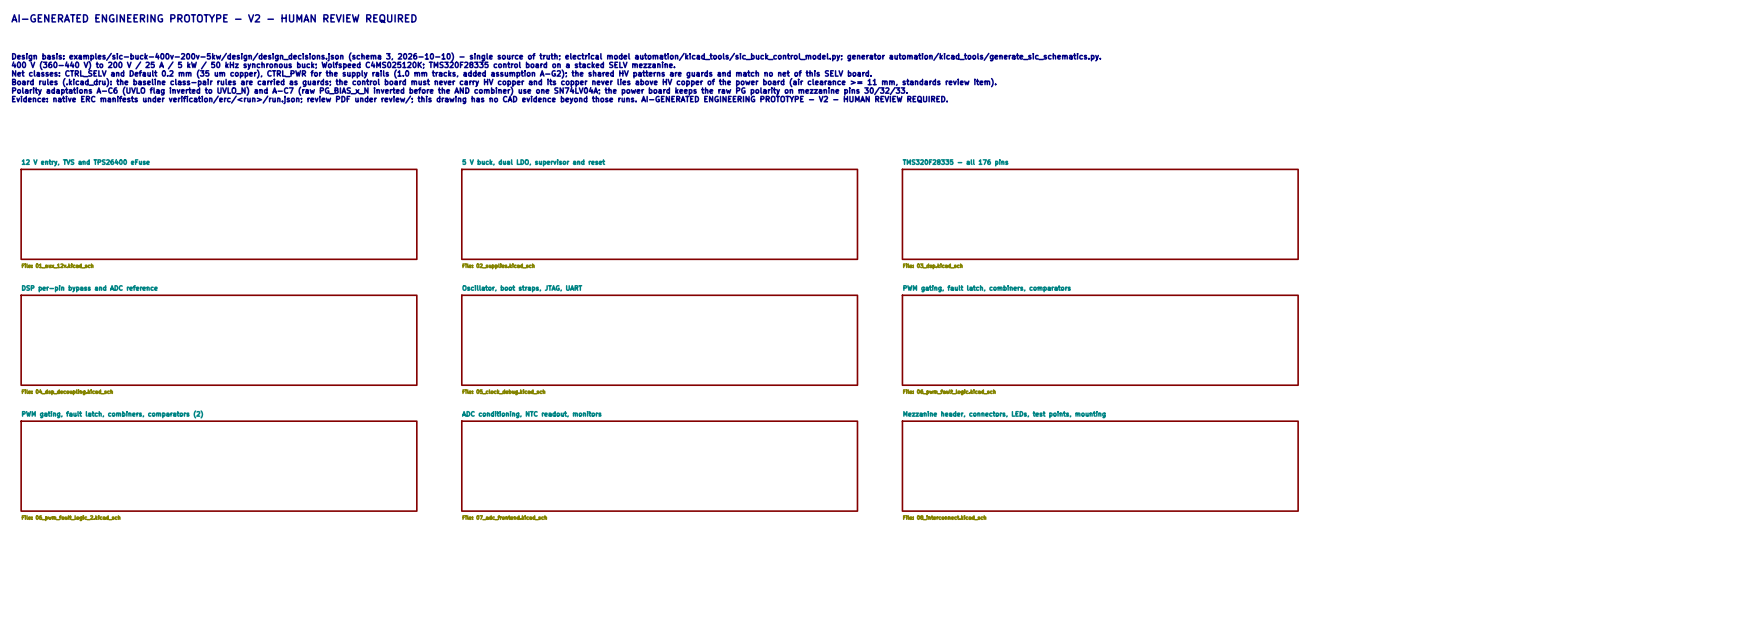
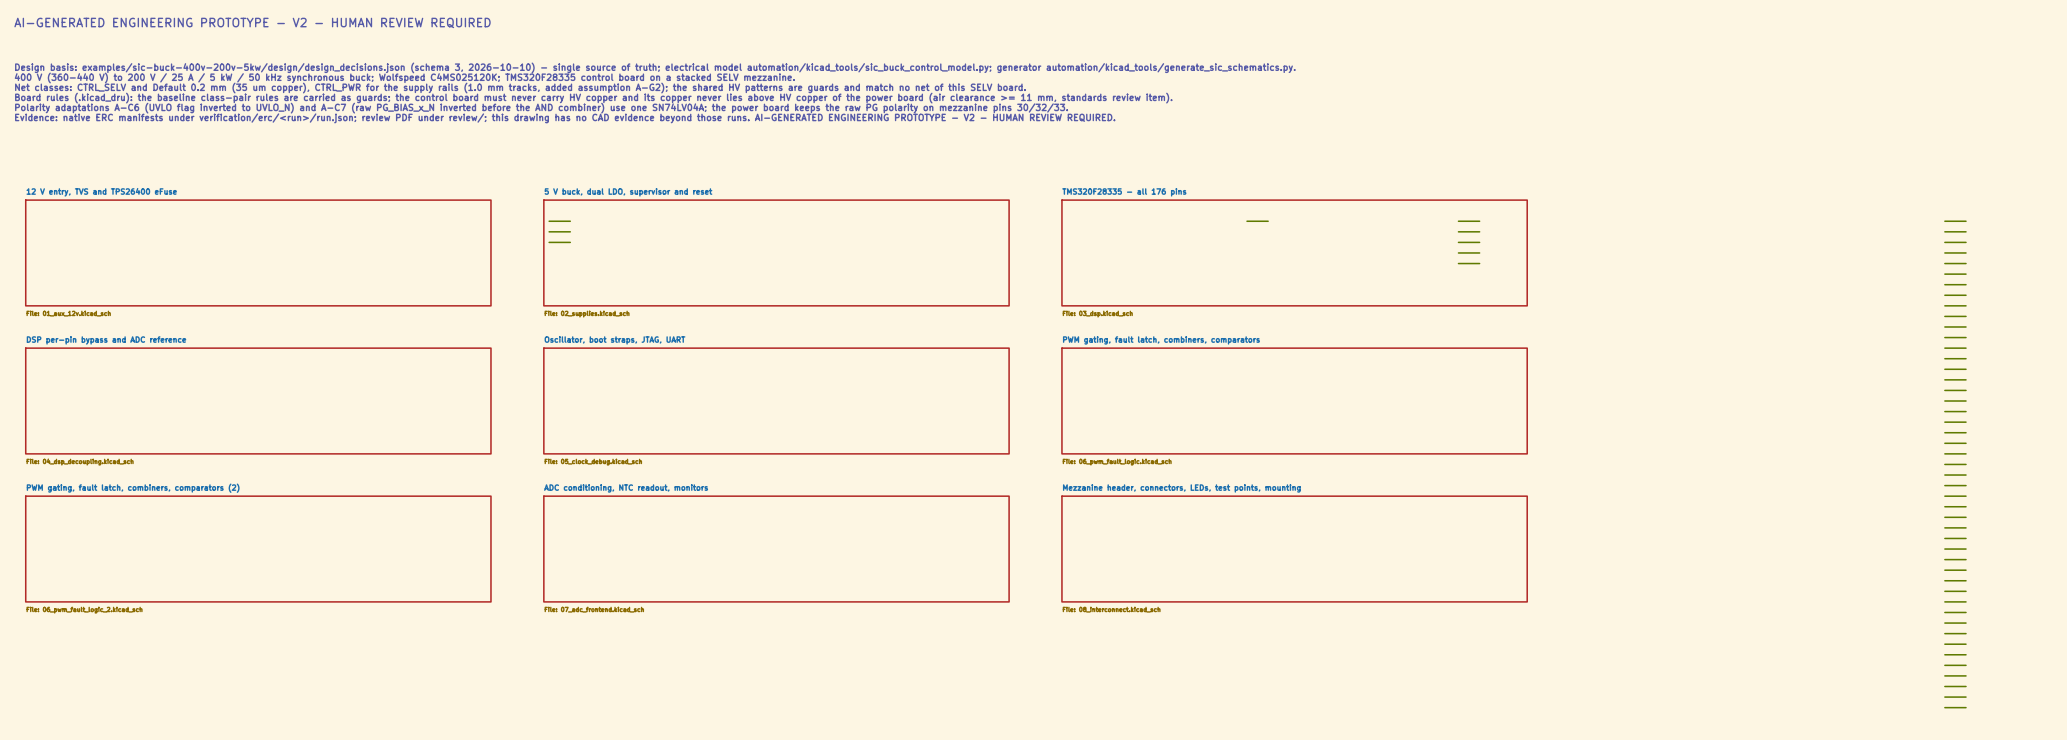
wire: none -> (549, 221) (570, 221)
wire: none -> (1247, 221) (1268, 221)
wire: none -> (1458, 221) (1479, 221)
wire: none -> (1944, 221) (1966, 221)
wire: none -> (549, 231) (570, 231)
wire: none -> (1458, 231) (1479, 231)
wire: none -> (1944, 231) (1966, 231)
wire: none -> (549, 242) (570, 242)
wire: none -> (1458, 242) (1479, 242)
wire: none -> (1944, 242) (1966, 242)
wire: none -> (1458, 252) (1479, 252)
wire: none -> (1944, 252) (1966, 252)
wire: none -> (1458, 263) (1479, 263)
wire: none -> (1944, 263) (1966, 263)
wire: none -> (1944, 274) (1966, 274)
wire: none -> (1944, 284) (1966, 284)
wire: none -> (1944, 295) (1966, 295)
wire: none -> (1944, 305) (1966, 305)
wire: none -> (1944, 316) (1966, 316)
wire: none -> (1944, 326) (1966, 326)
wire: none -> (1944, 337) (1966, 337)
wire: none -> (1944, 348) (1966, 348)
wire: none -> (1944, 358) (1966, 358)
wire: none -> (1944, 369) (1966, 369)
wire: none -> (1944, 379) (1966, 379)
wire: none -> (1944, 390) (1966, 390)
wire: none -> (1944, 401) (1966, 401)
wire: none -> (1944, 411) (1966, 411)
wire: none -> (1944, 422) (1966, 422)
wire: none -> (1944, 432) (1966, 432)
wire: none -> (1944, 443) (1966, 443)
wire: none -> (1944, 453) (1966, 453)
wire: none -> (1944, 464) (1966, 464)
wire: none -> (1944, 475) (1966, 475)
wire: none -> (1944, 485) (1966, 485)
wire: none -> (1944, 496) (1966, 496)
wire: none -> (1944, 506) (1966, 506)
wire: none -> (1944, 517) (1966, 517)
wire: none -> (1944, 527) (1966, 527)
wire: none -> (1944, 538) (1966, 538)
wire: none -> (1944, 549) (1966, 549)
wire: none -> (1944, 559) (1966, 559)
wire: none -> (1944, 570) (1966, 570)
wire: none -> (1944, 580) (1966, 580)
wire: none -> (1944, 591) (1966, 591)
wire: none -> (1944, 601) (1966, 601)
wire: none -> (1944, 612) (1966, 612)
wire: none -> (1944, 623) (1966, 623)
wire: none -> (1944, 633) (1966, 633)
wire: none -> (1944, 644) (1966, 644)
wire: none -> (1944, 654) (1966, 654)
wire: none -> (1944, 665) (1966, 665)
wire: none -> (1944, 675) (1966, 675)
wire: none -> (1944, 686) (1966, 686)
wire: none -> (1944, 697) (1966, 697)
wire: none -> (1944, 707) (1966, 707)

